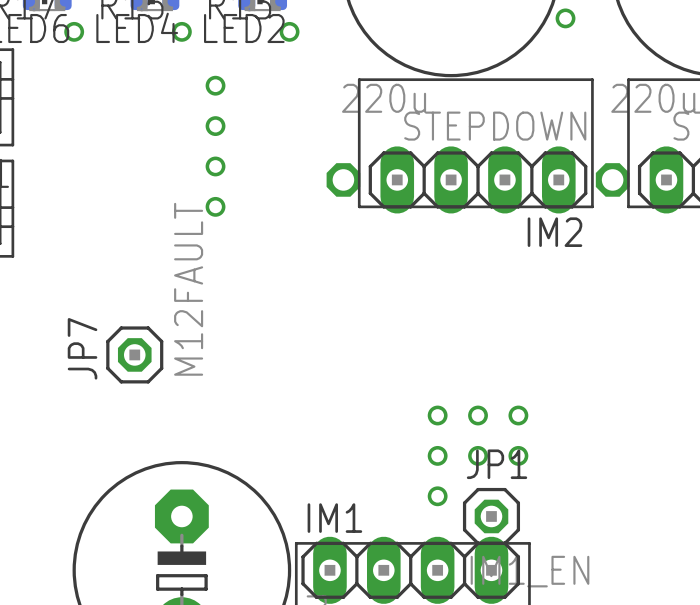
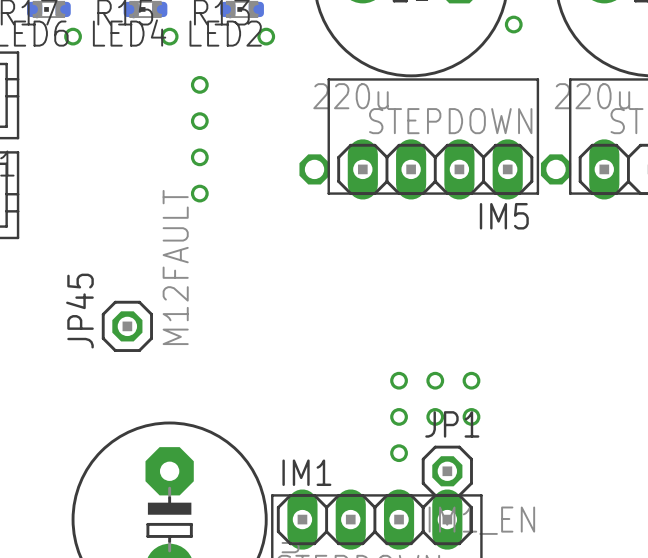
IM2 name: IM2 (554, 232) -> IM5 (504, 216)
JP7 name: JP7 (82, 348) -> JP45 (79, 311)

